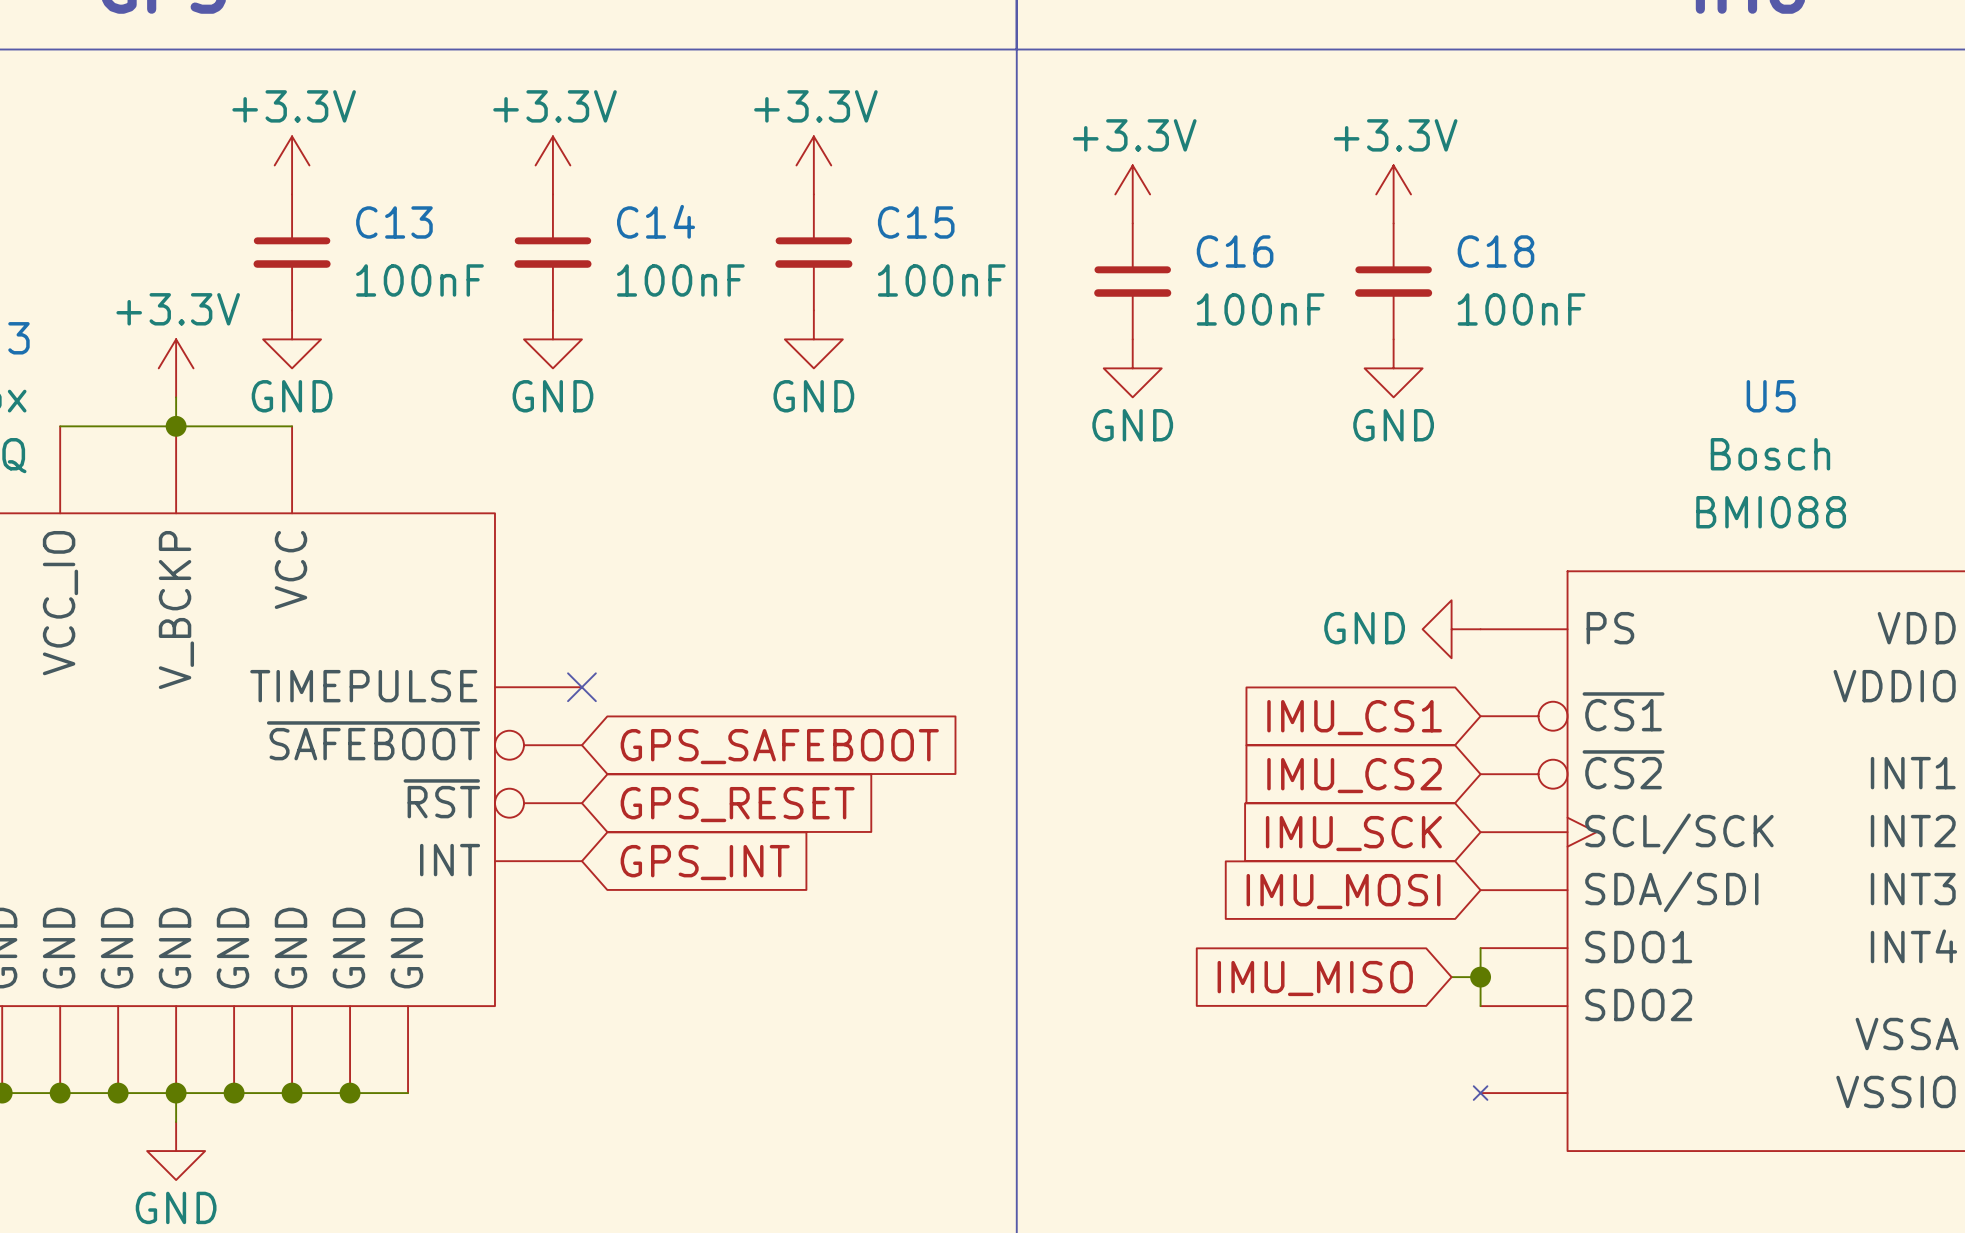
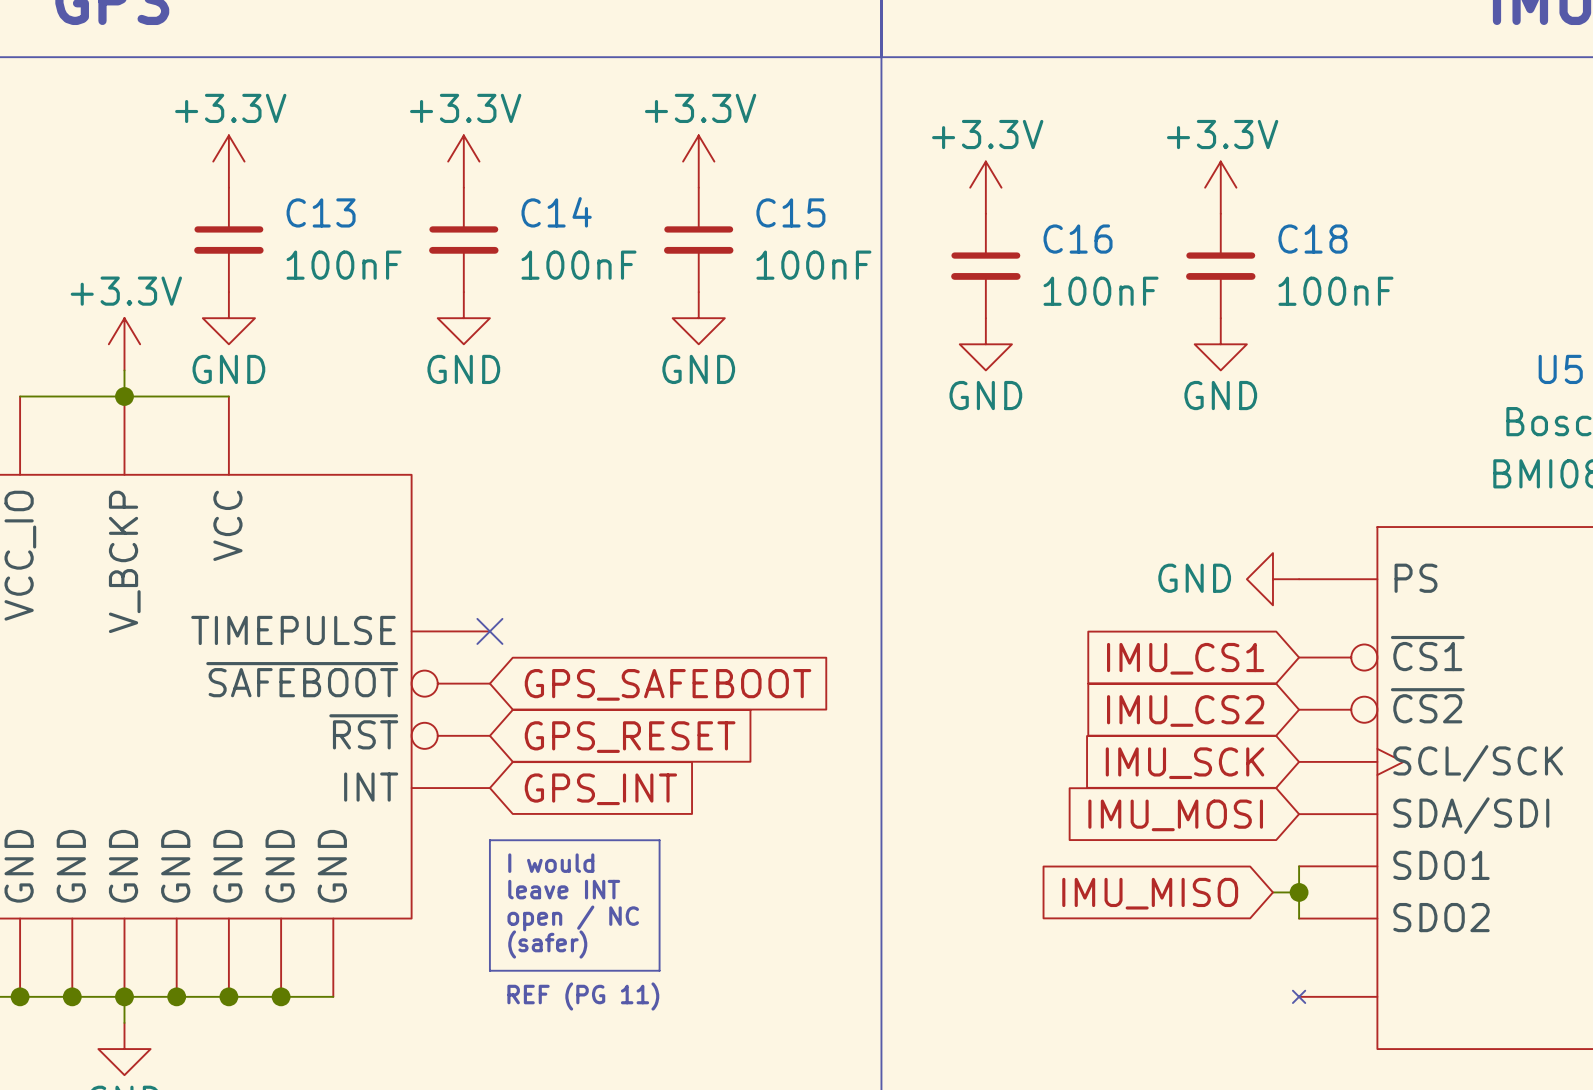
line: none -> (489, 840) (659, 840) (659, 970) (489, 970) (489, 840)
text: none -> I would (551, 863)
text: none -> leave INT (564, 889)
text: none -> open / NC (573, 918)
text: none -> (safer) (547, 944)
text: none -> REF (PG 11) (583, 996)

